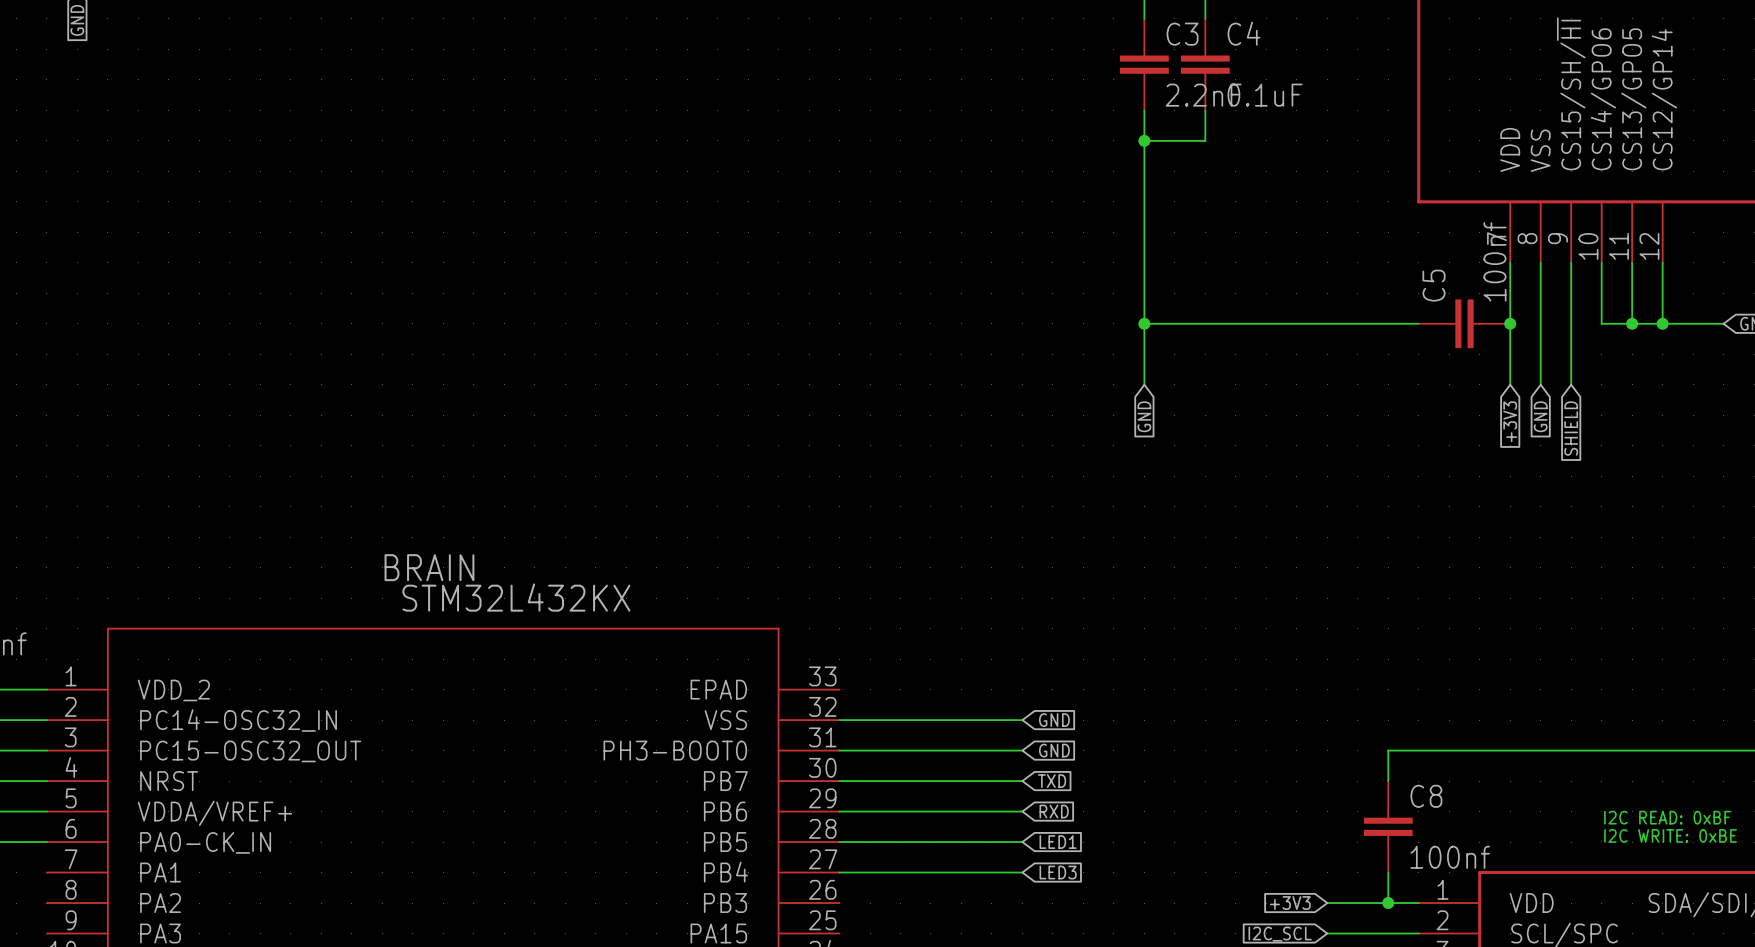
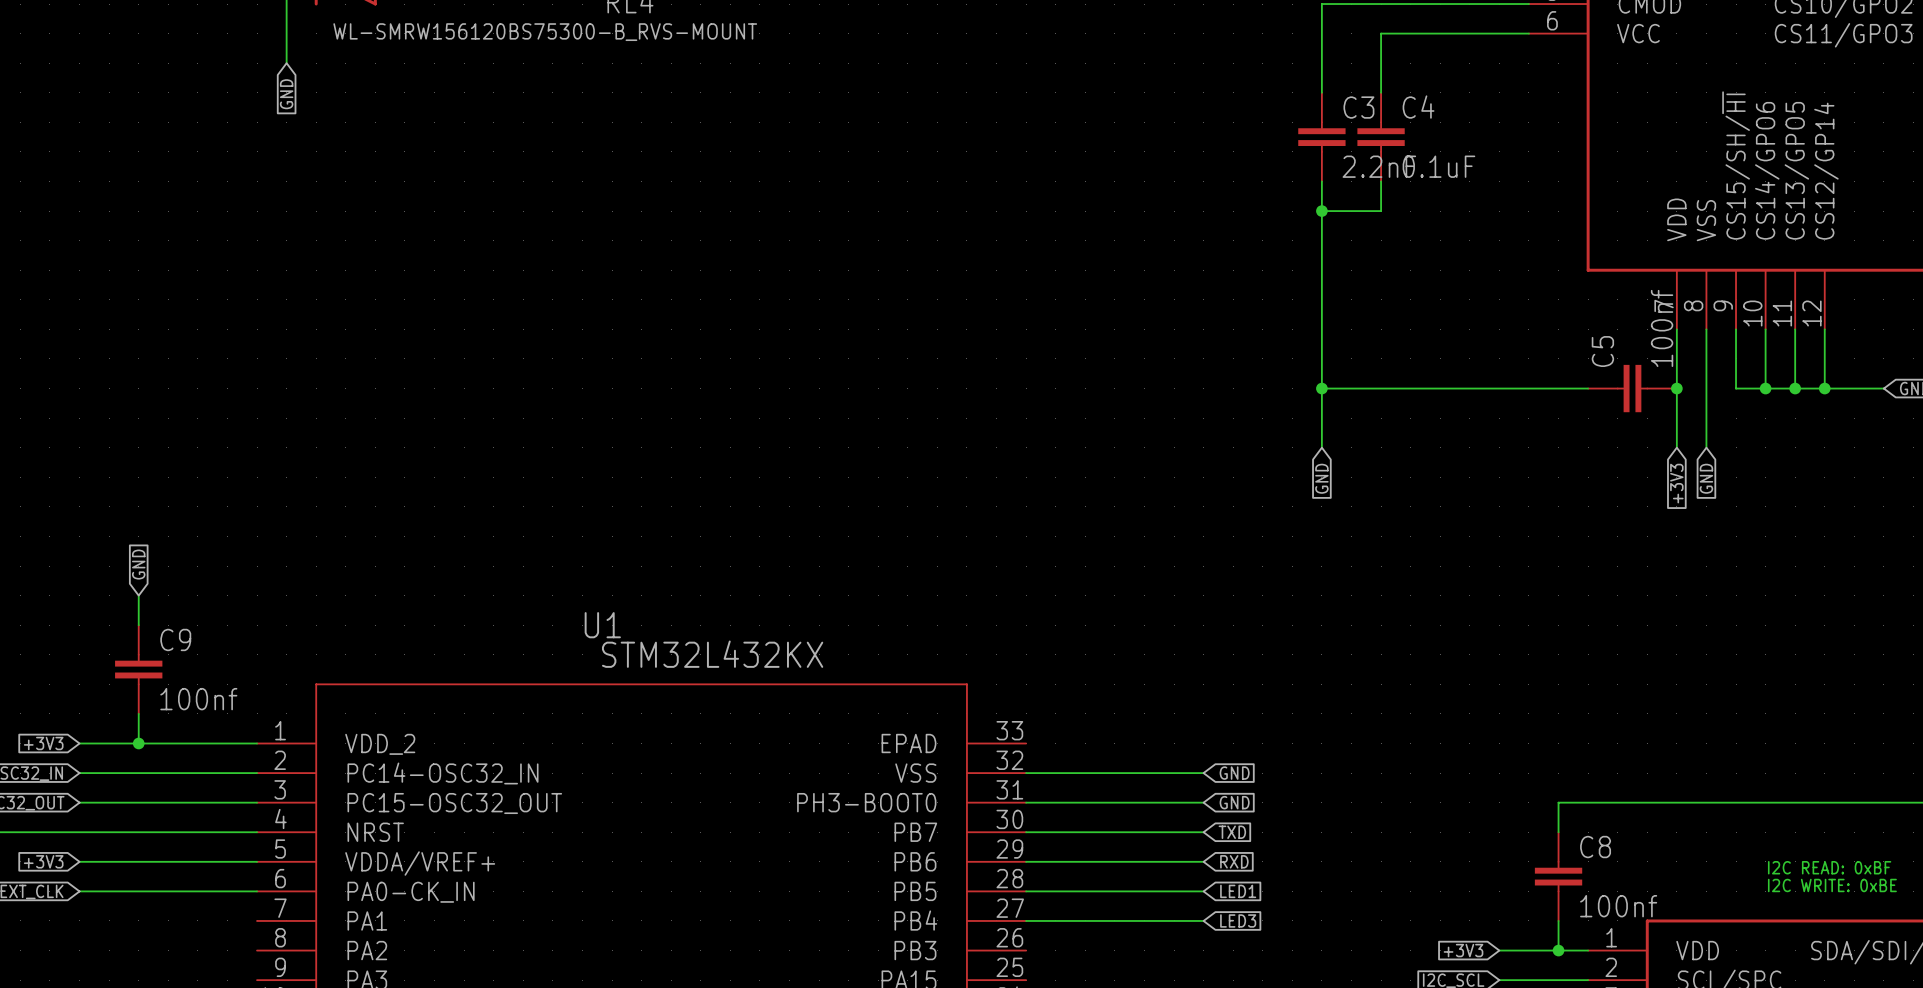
wire: (1571, 323) (1571, 384) -> (1736, 388) (1765, 388)
junction: none -> (1765, 388)
global label: SHIELD (1571, 428) -> none
BRAIN name: BRAIN (429, 567) -> U1 (602, 625)

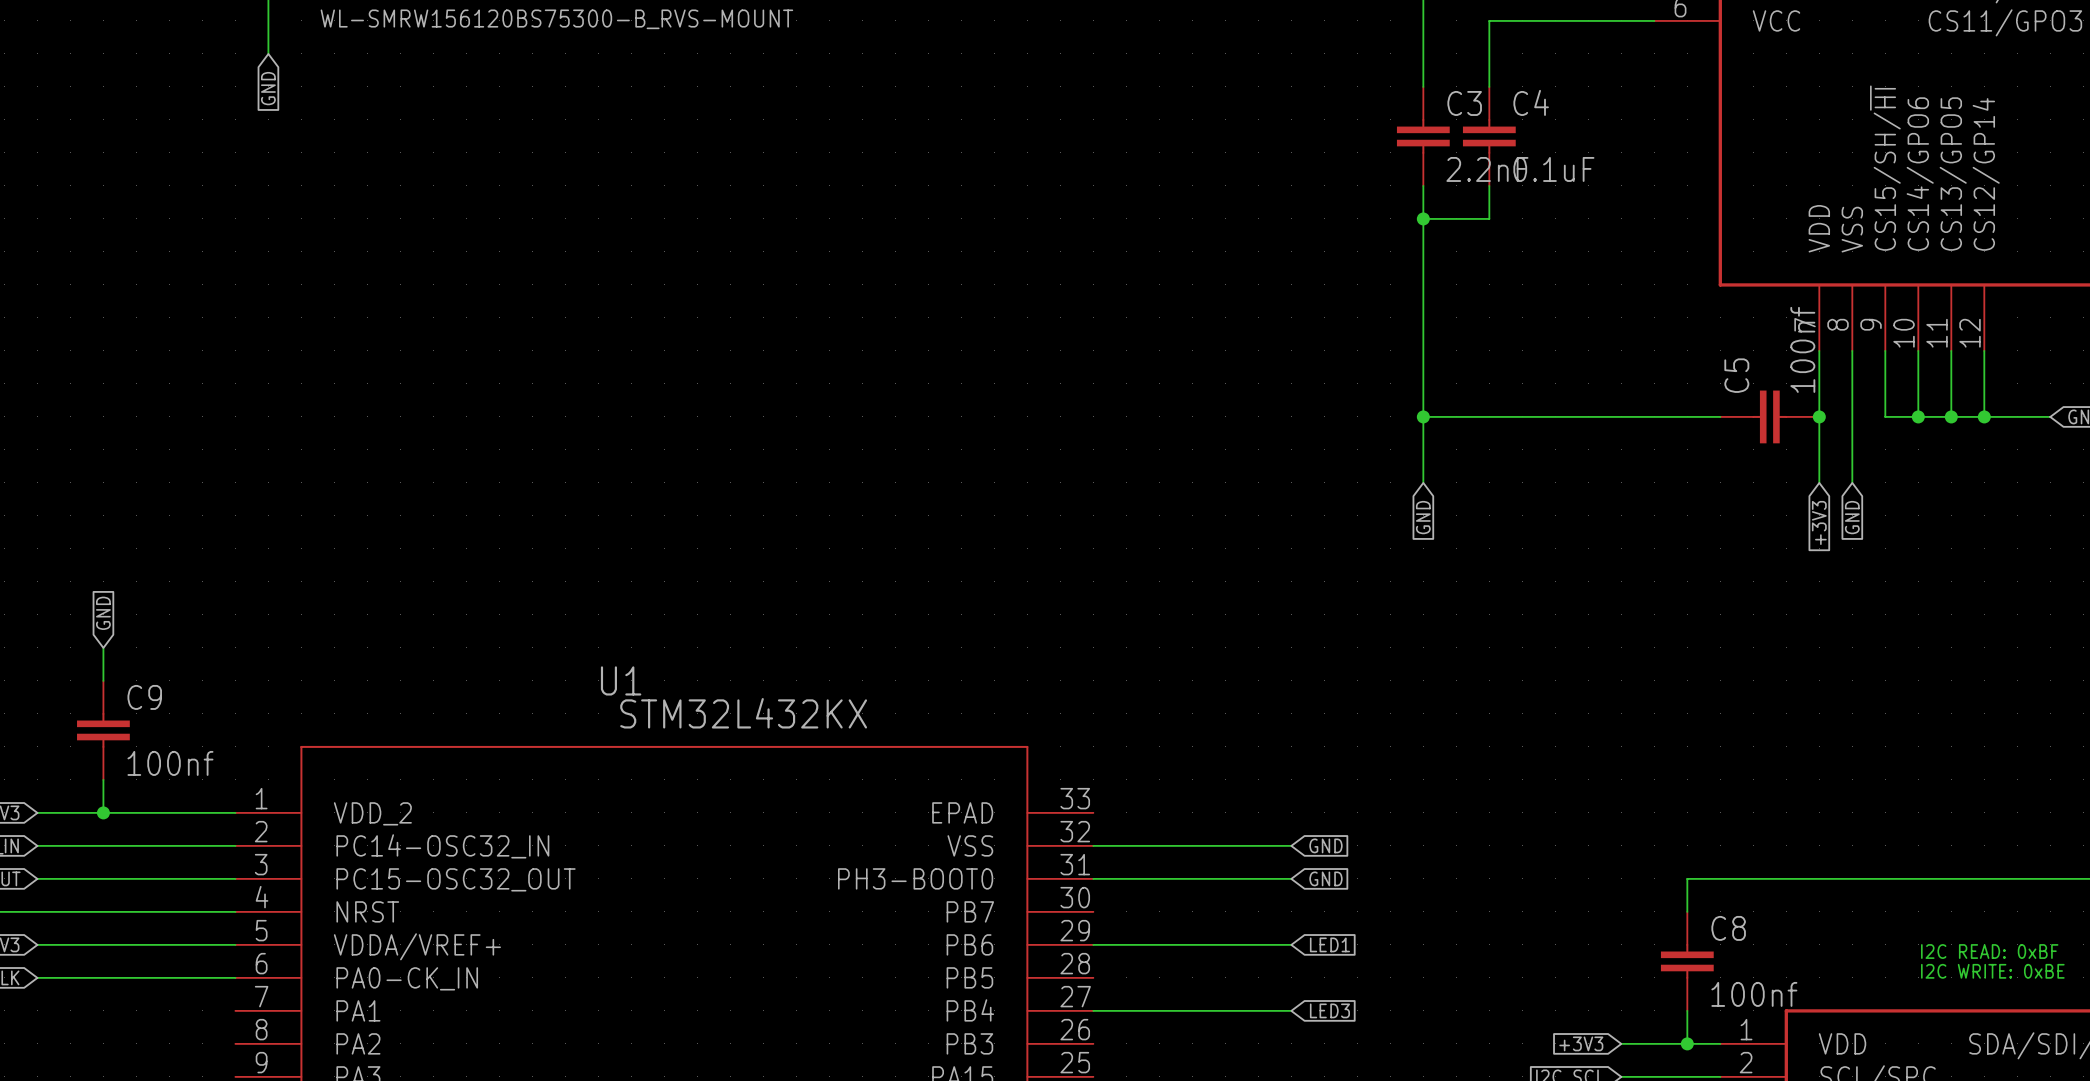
wire: (1026, 832) (1203, 832) -> none
global label: TXD (1232, 832) -> none
global label: RXD (1234, 861) -> LED1 (1329, 944)
wire: (1026, 891) (1203, 891) -> none
global label: LED1 (1238, 891) -> none

